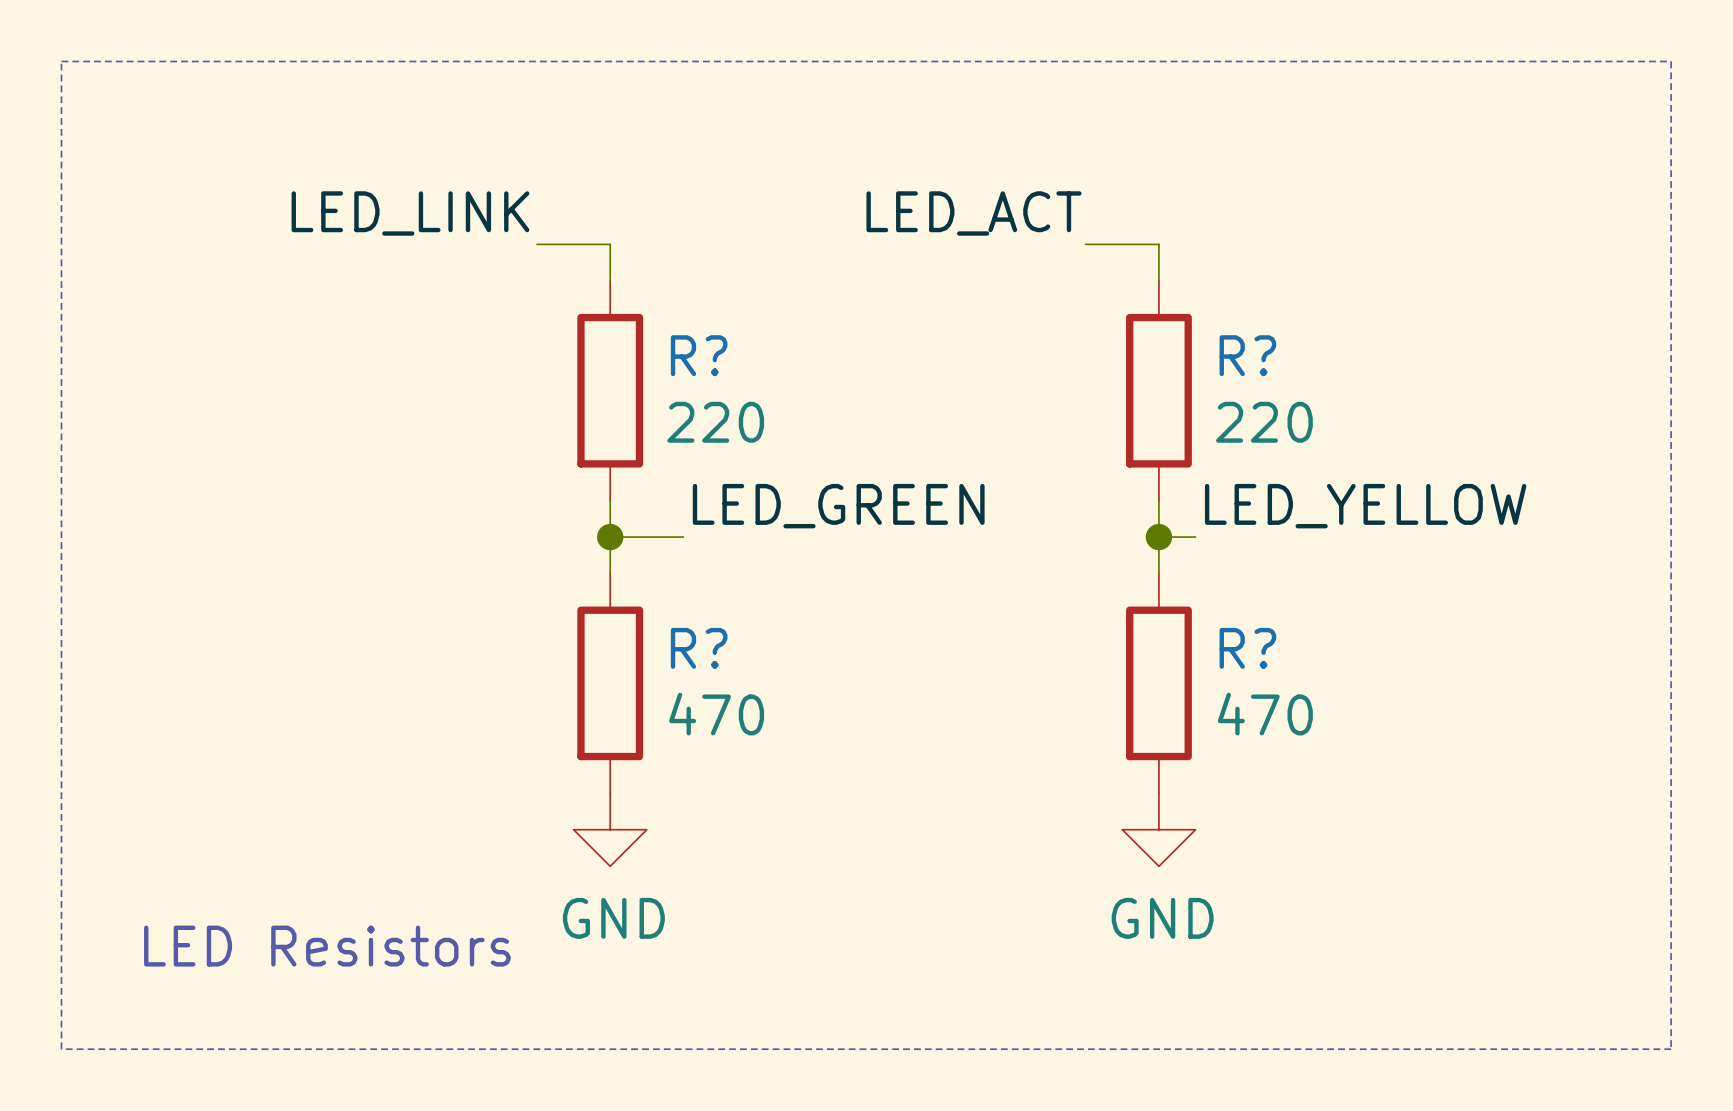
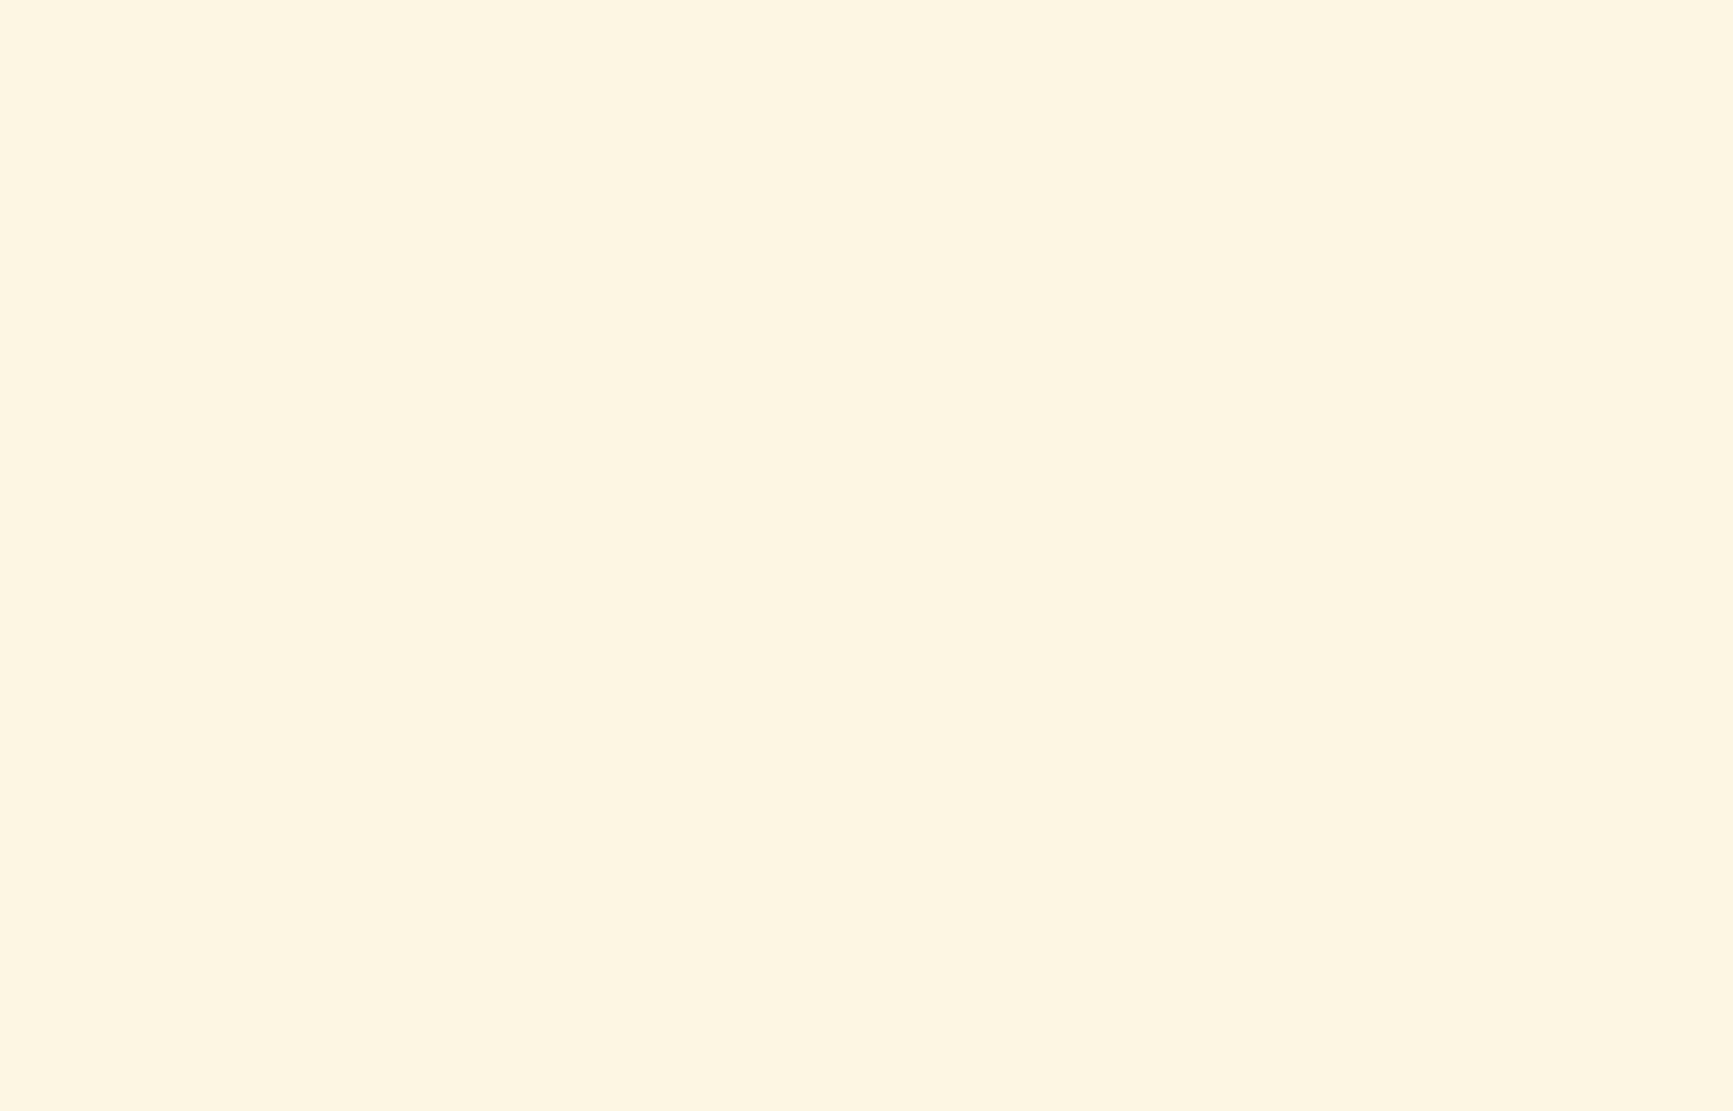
line: (61, 61) (61, 1049) (1671, 1049) (1671, 61) (61, 61) -> none
label: LED_LINK (410, 213) -> none
label: LED_ACT (974, 213) -> none
wire: (537, 244) (610, 244) (610, 280) -> none
wire: (1085, 244) (1158, 244) (1158, 280) -> none
R?: 220 (610, 390) -> none
R?: 220 (1158, 390) -> none
wire: (610, 500) (610, 573) -> none
wire: (1158, 500) (1158, 573) -> none
label: LED_GREEN (838, 506) -> none
label: LED_YELLOW (1365, 506) -> none
wire: (610, 537) (683, 537) -> none
junction: (610, 537) -> none
wire: (1158, 537) (1195, 537) -> none
junction: (1158, 537) -> none
R?: 470 (610, 683) -> none
R?: 470 (1158, 683) -> none
power symbol: GND (610, 829) -> none
power symbol: GND (1158, 829) -> none
text: LED Resistors (327, 946) -> none

